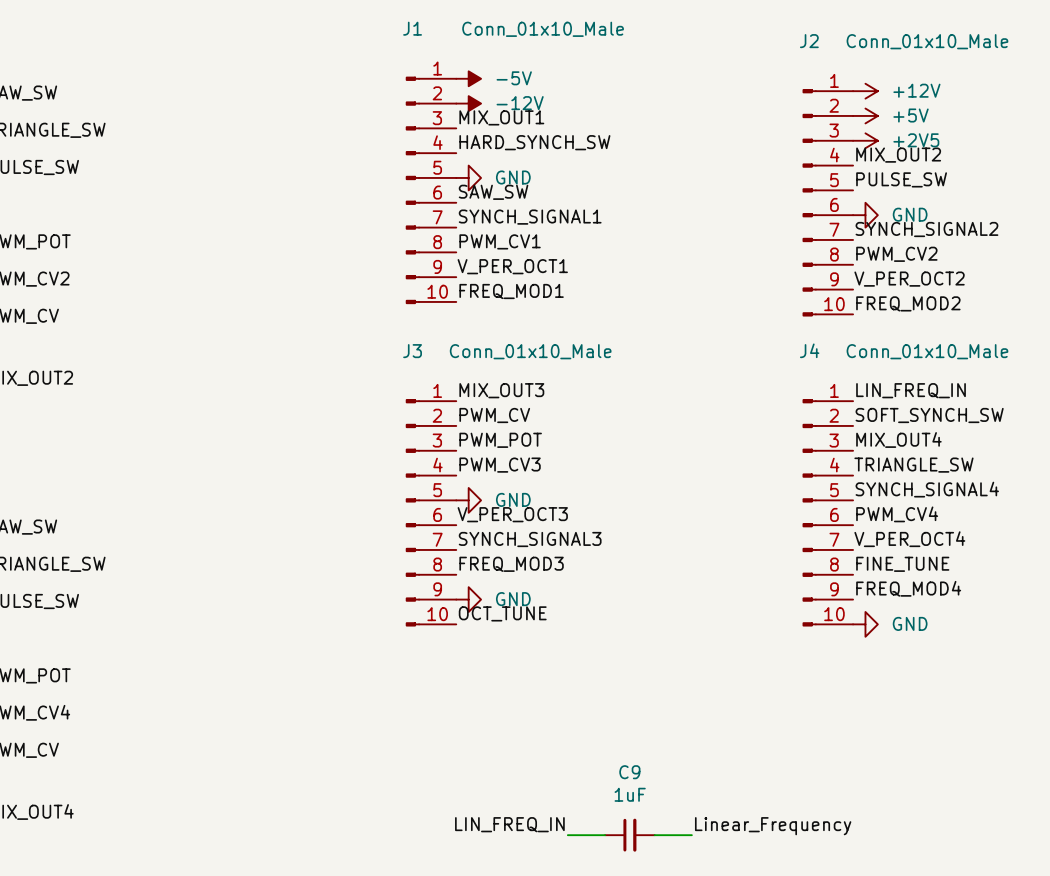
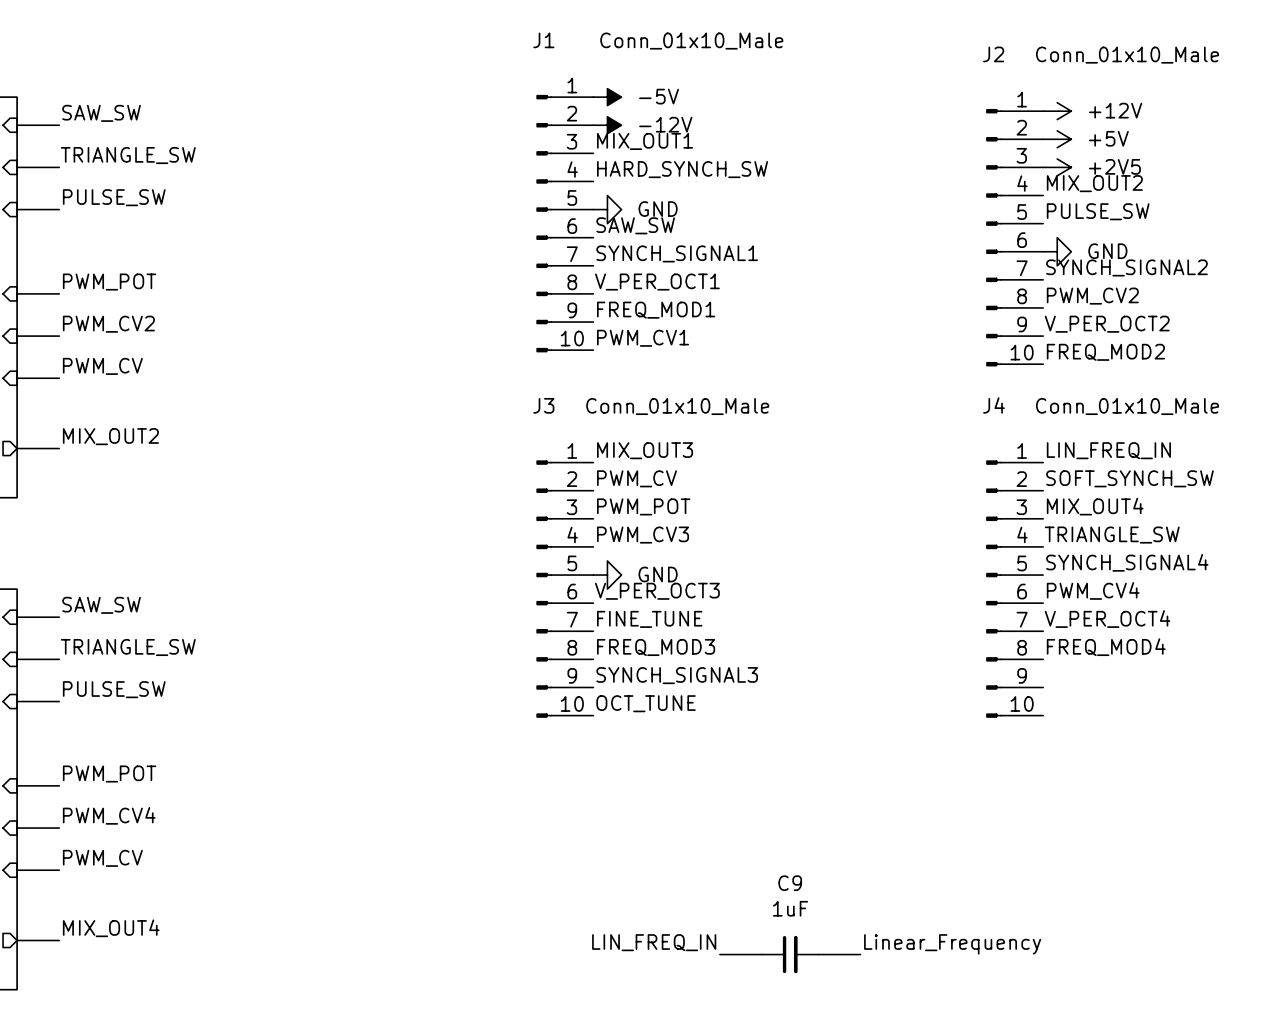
label: PWM_CV1 (500, 241) -> V_PER_OCT1 (657, 282)
label: V_PER_OCT1 (512, 266) -> FREQ_MOD1 (656, 310)
label: FREQ_MOD1 (511, 291) -> PWM_CV1 (643, 338)
label: SYNCH_SIGNAL3 (530, 539) -> FINE_TUNE (649, 619)
label: FINE_TUNE (902, 564) -> FREQ_MOD4 (1106, 647)
label: FREQ_MOD4 (908, 588) -> none
label: none -> SYNCH_SIGNAL3 (677, 675)
power symbol: GND (468, 599) -> none
power symbol: GND (865, 624) -> none

